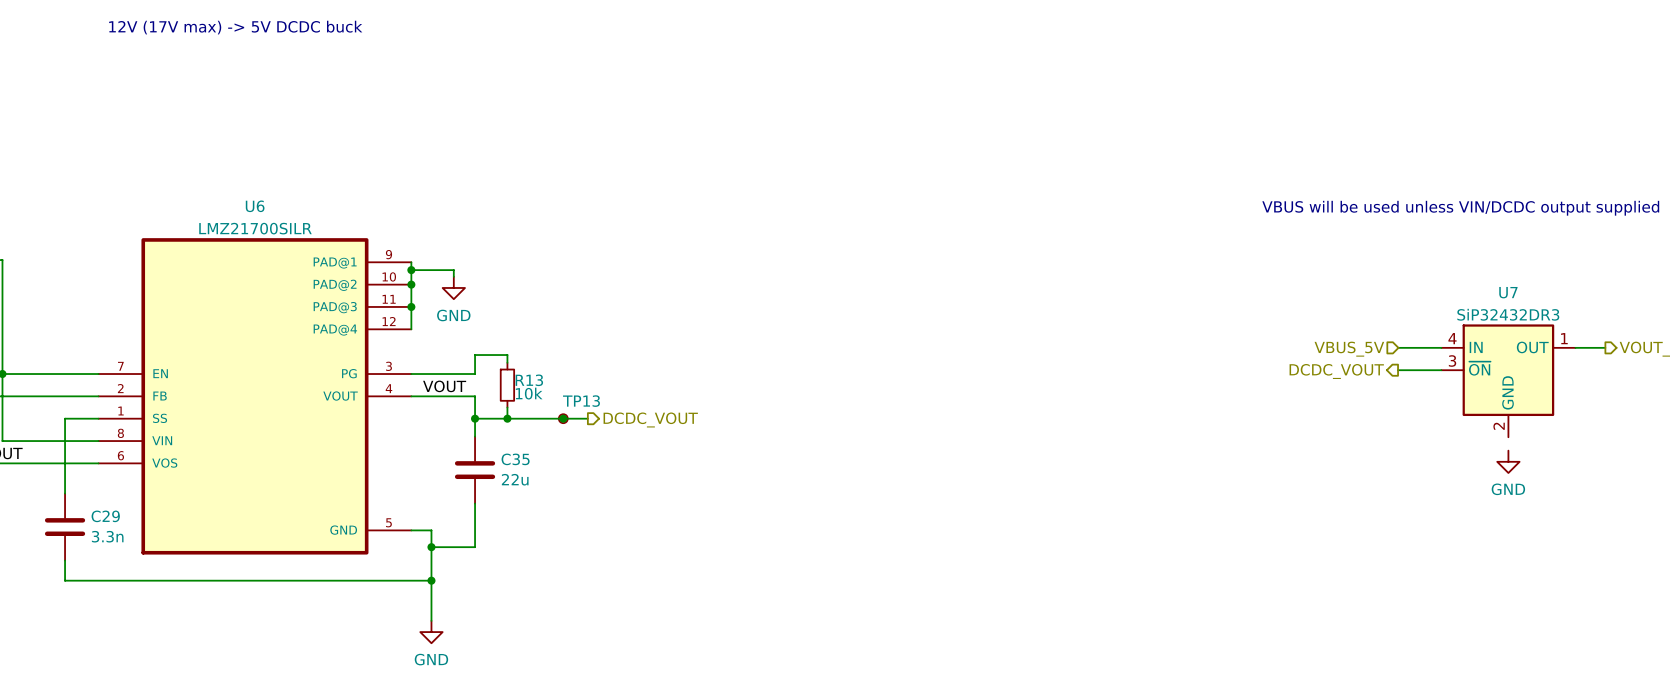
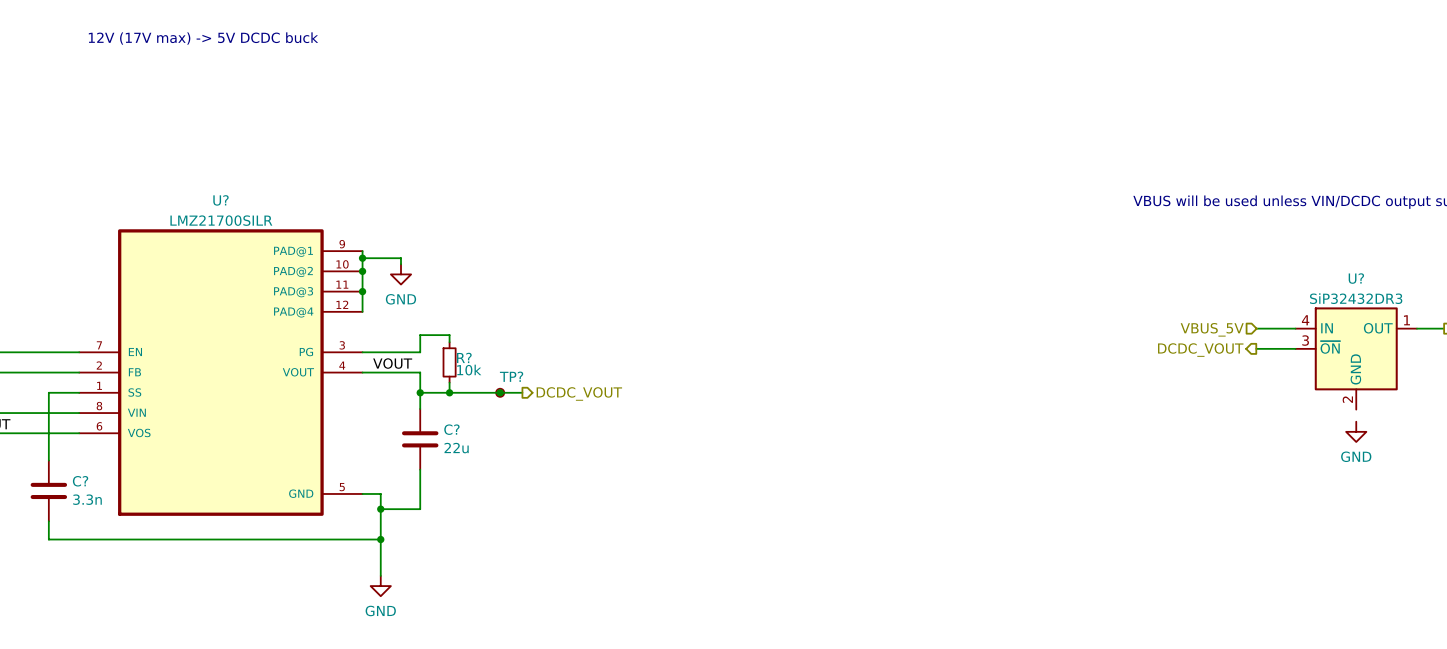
U6 name: U6 (255, 206) -> U? (220, 200)
U7 name: U7 (1508, 292) -> U? (1356, 278)
R13 name: R13 (529, 380) -> R? (464, 357)
TP13 name: TP13 (581, 401) -> TP? (511, 376)
C35 name: C35 (515, 459) -> C? (451, 429)
C29 name: C29 (105, 516) -> C? (80, 481)

